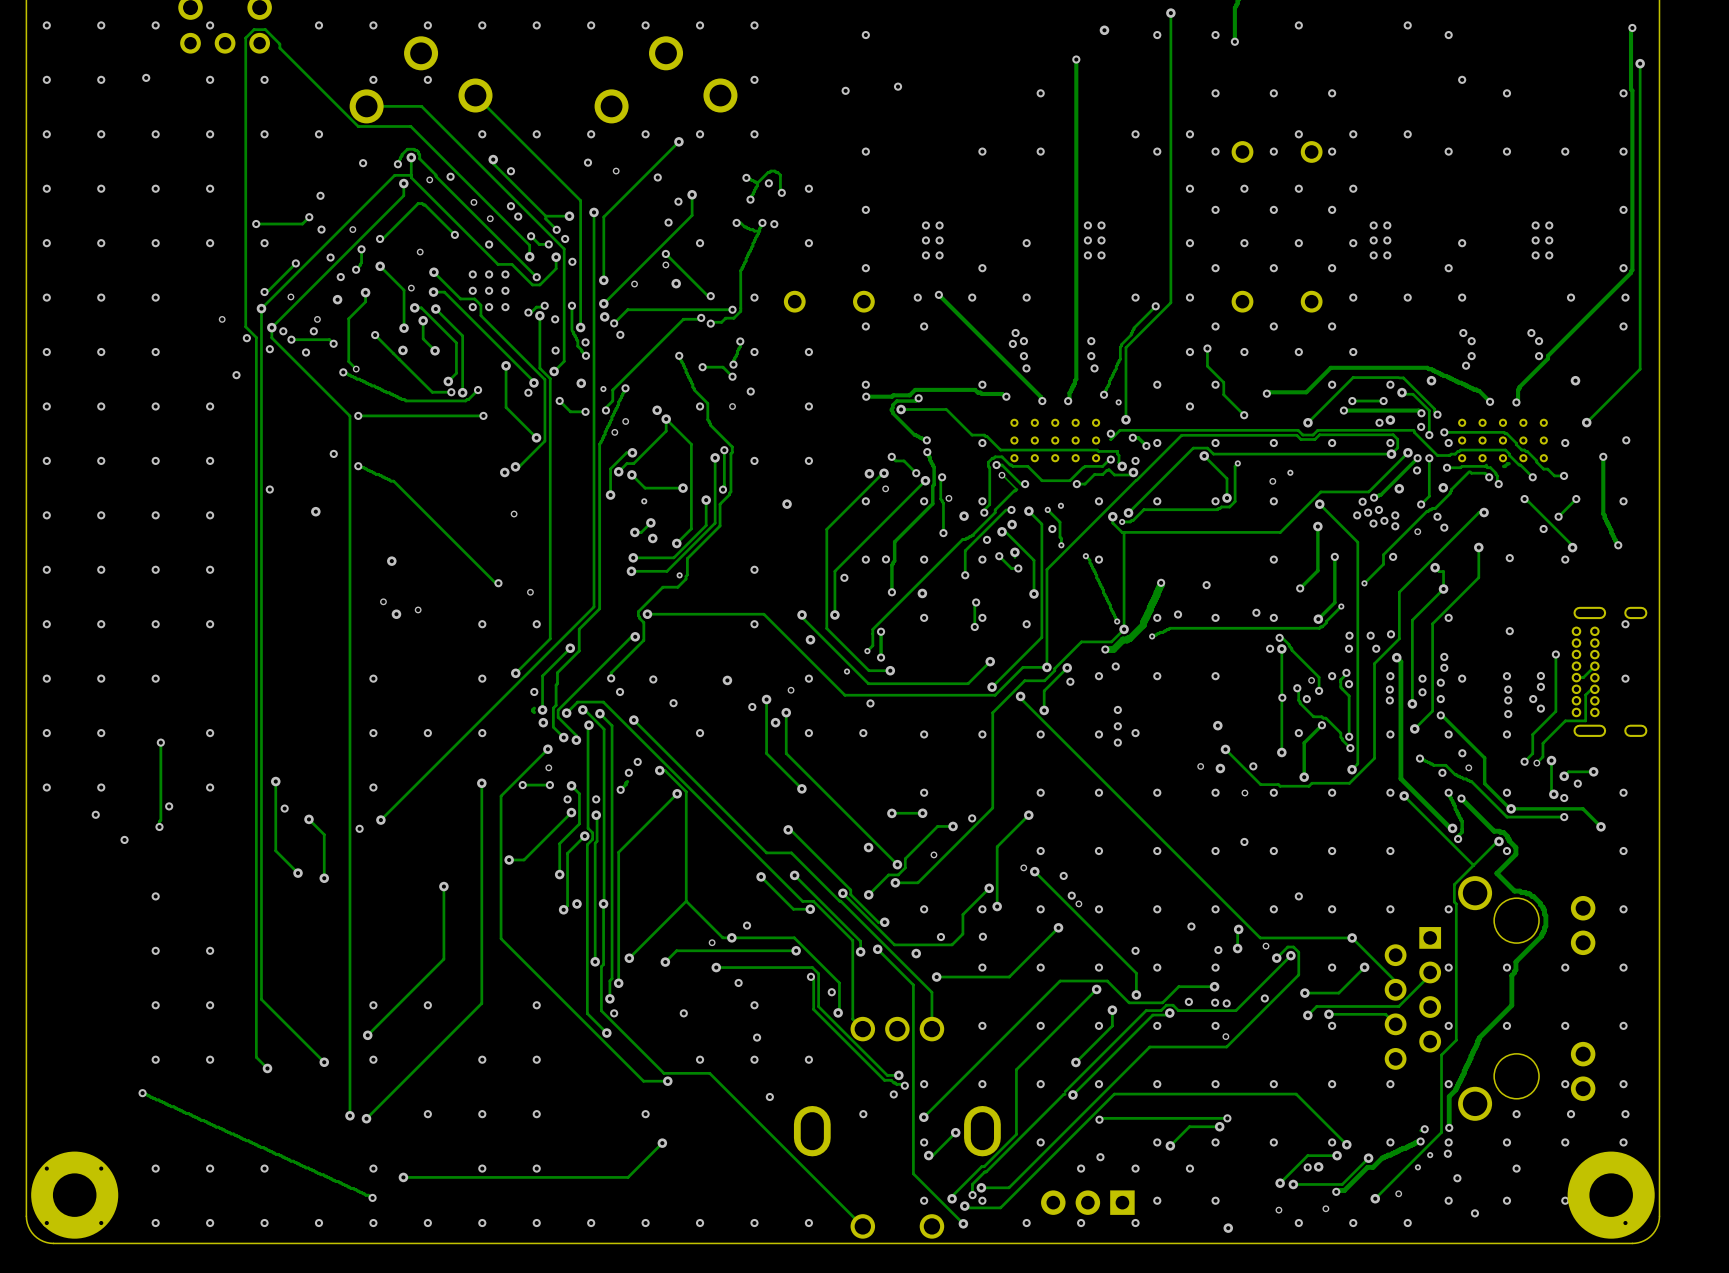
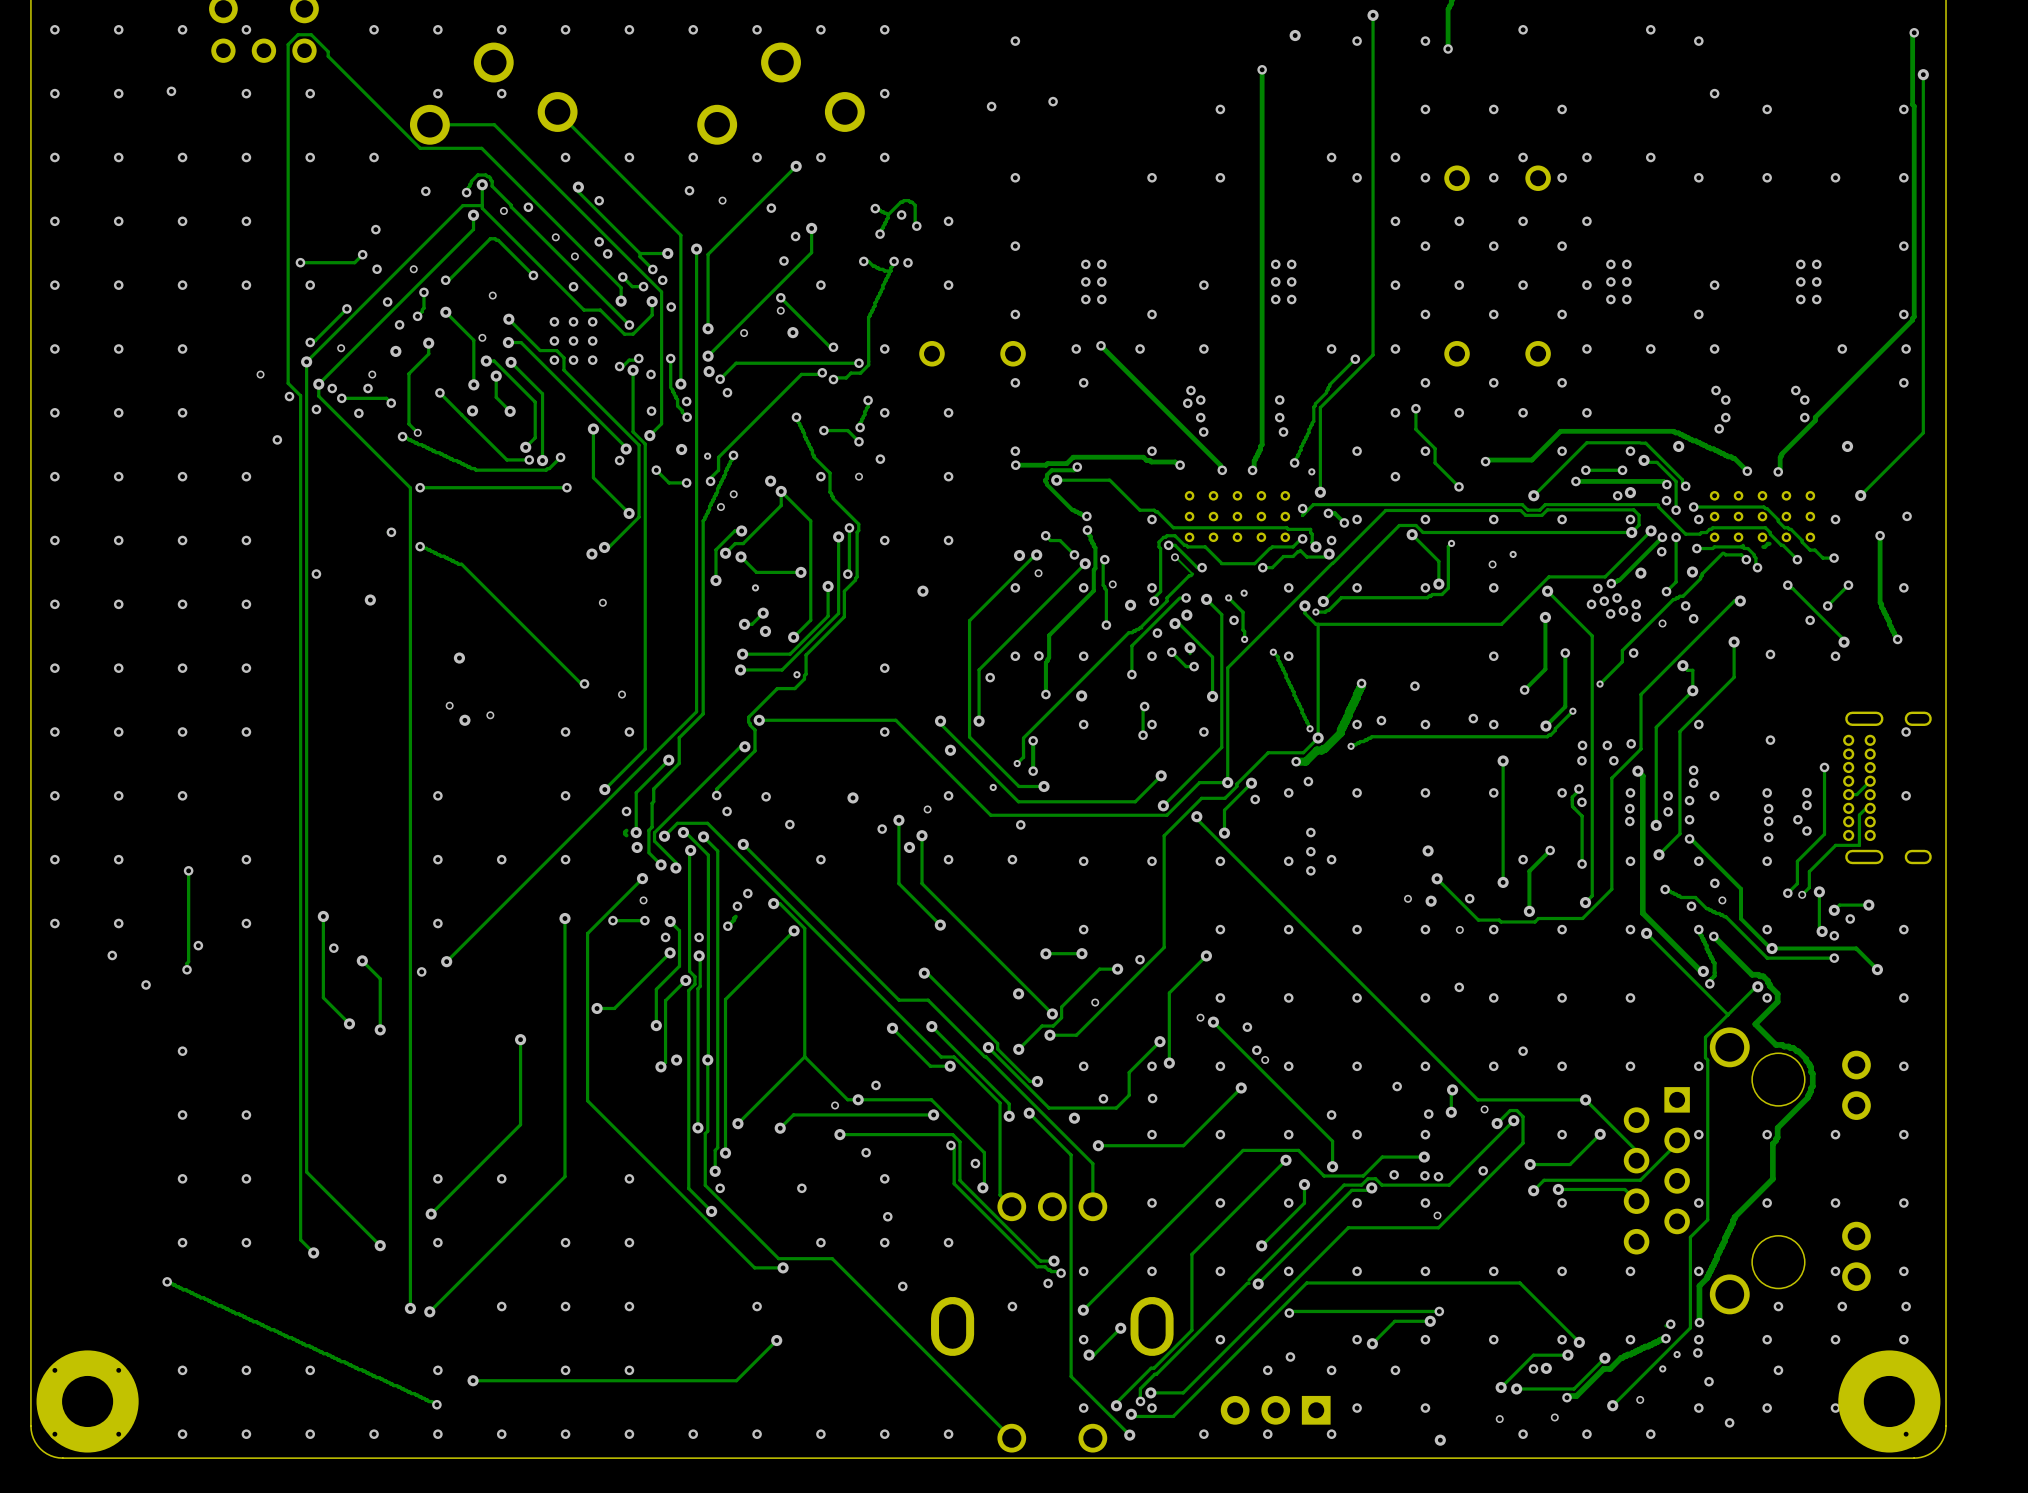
track: (1279, 637) (1282, 637) (1289, 644) (1291, 650) (1319, 677) (1319, 690) -> none
via: (1279, 637) -> none
via: (1270, 648) -> none
via: none -> (1493, 792)
via: (1311, 680) -> none
track: (1297, 688) (1300, 703) (1313, 716) (1325, 718) (1340, 733) (1342, 739) (1350, 748) -> none
via: (1297, 688) -> none
via: (1319, 690) -> none
via: (1282, 697) -> none
via: (1306, 699) -> none
via: (1350, 748) -> none

